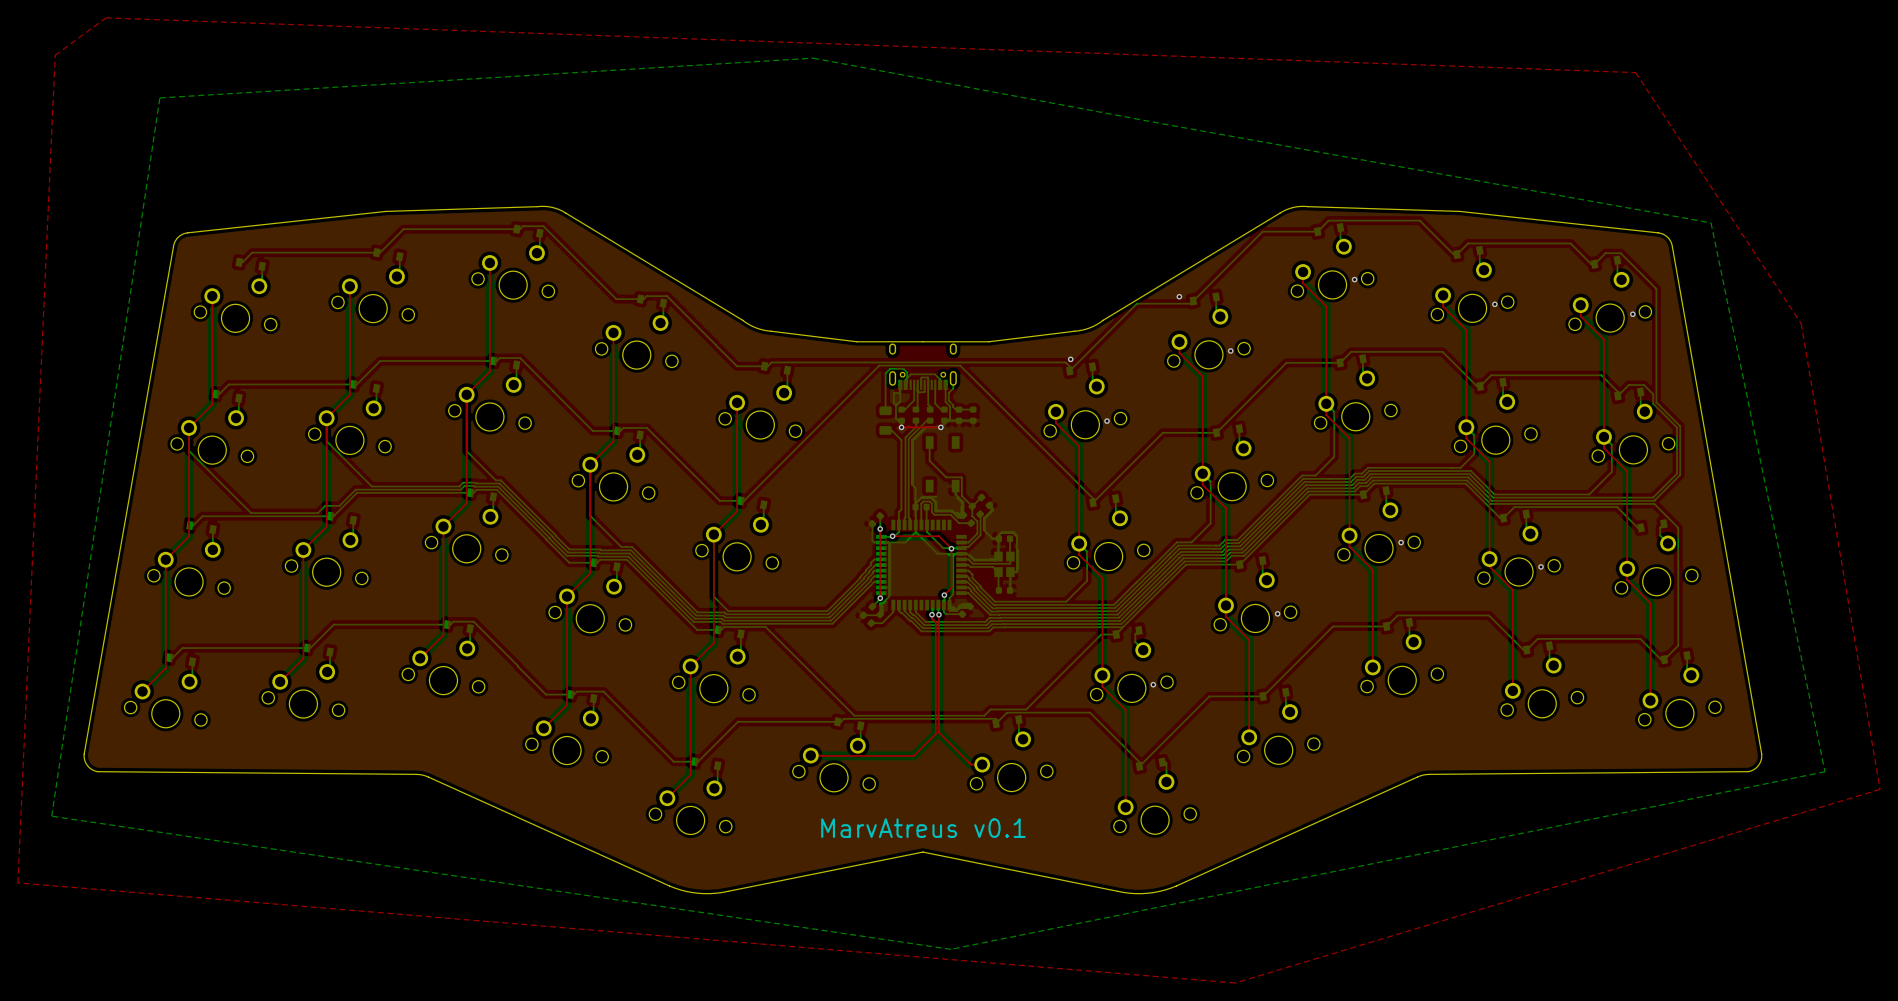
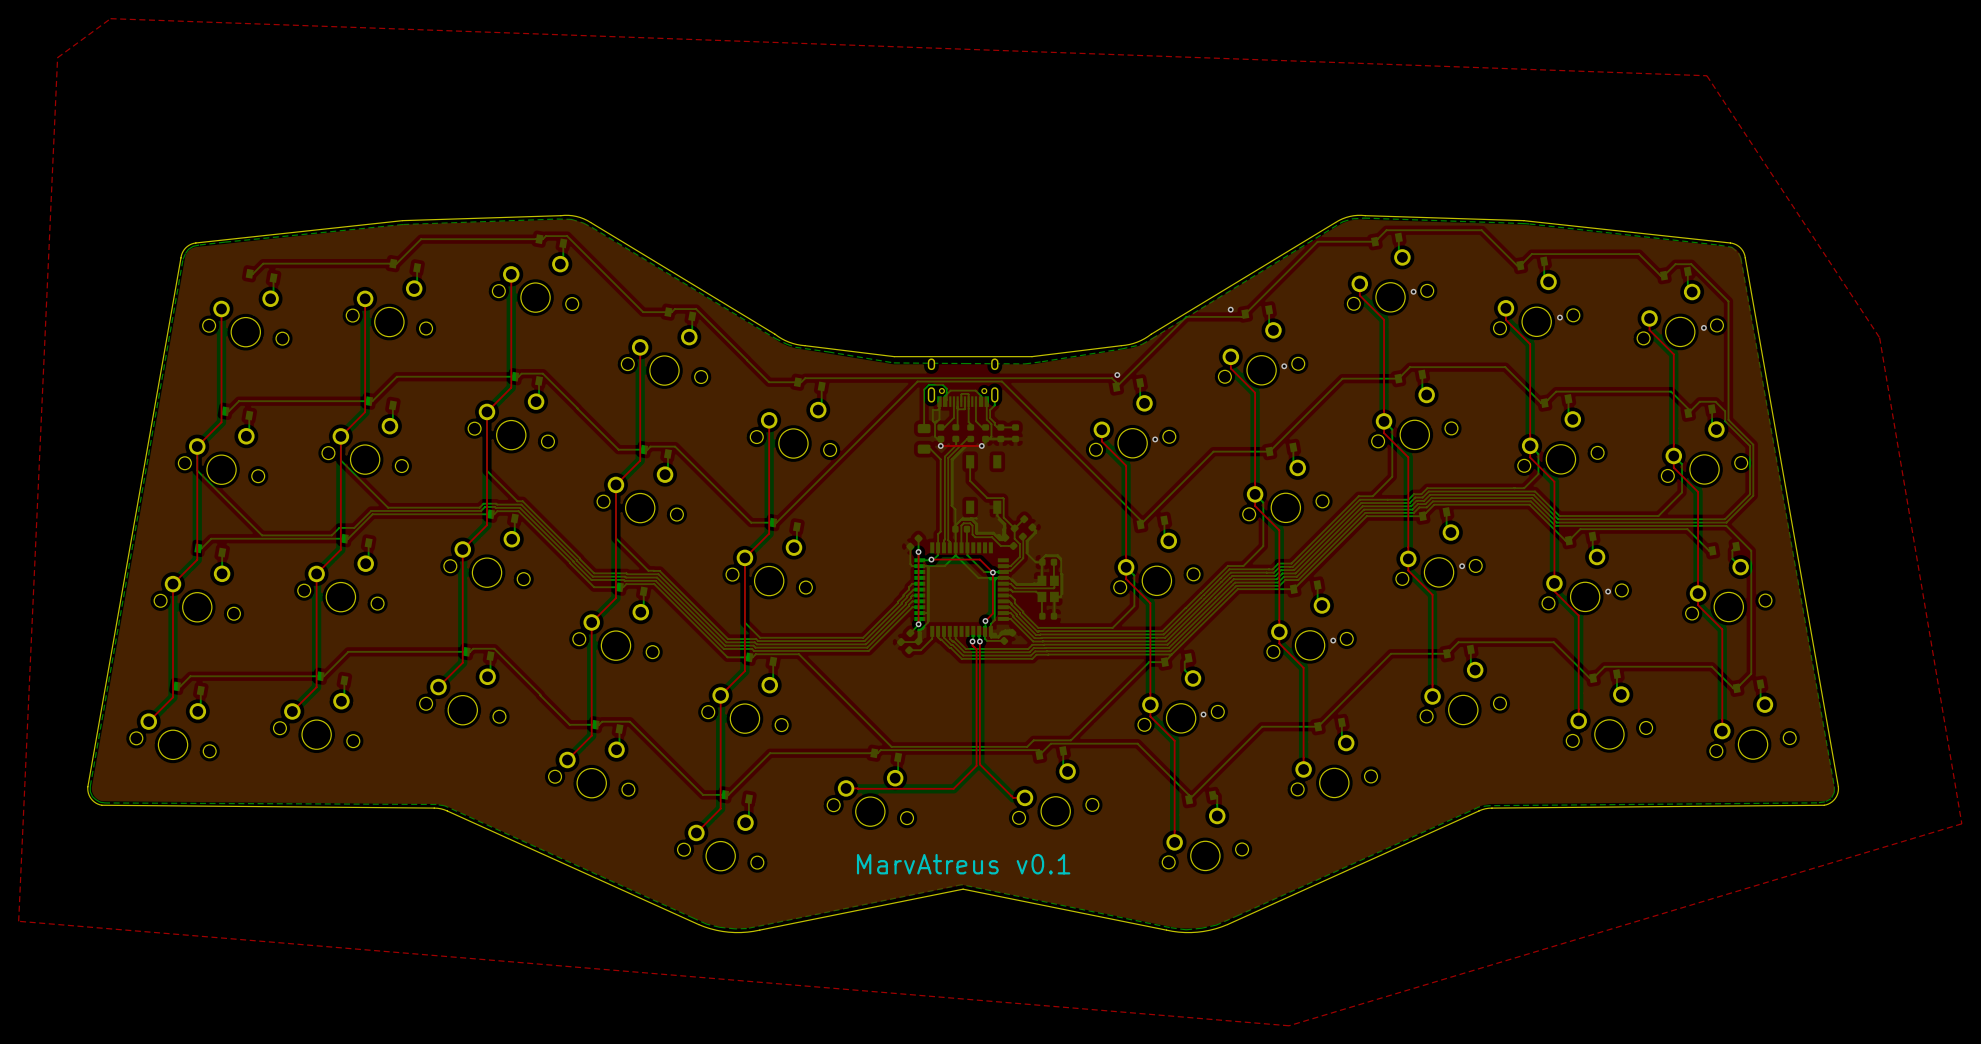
bottom zone outline: (813, 58) (159, 97) (51, 816) (950, 949) (1825, 771) (1711, 222) (1162, 123) (813, 58) -> (1364, 218) (1342, 221) (1141, 344) (1025, 363) (893, 362) (795, 347) (774, 338) (592, 227) (571, 219) (403, 224) (193, 246) (188, 249) (183, 259) (90, 791) (95, 799) (105, 802) (444, 805) (706, 924) (734, 928) (746, 928) (961, 884) (1169, 927) (1186, 929) (1201, 928) (1216, 925) (1479, 806) (1817, 802) (1831, 798) (1834, 786) (1738, 253) (1731, 247) (1718, 245) (1529, 223) (1364, 218)

